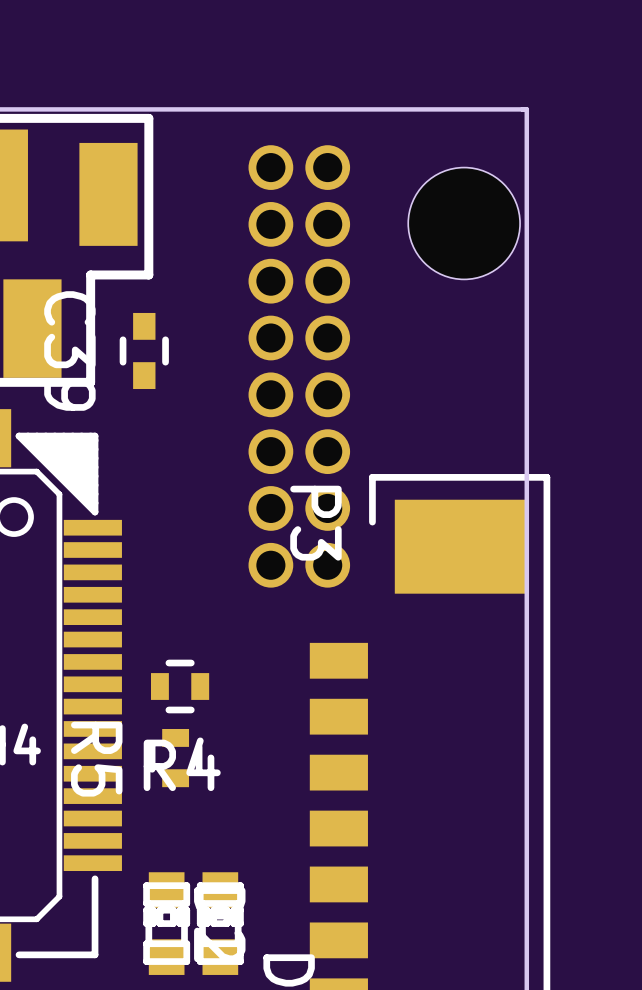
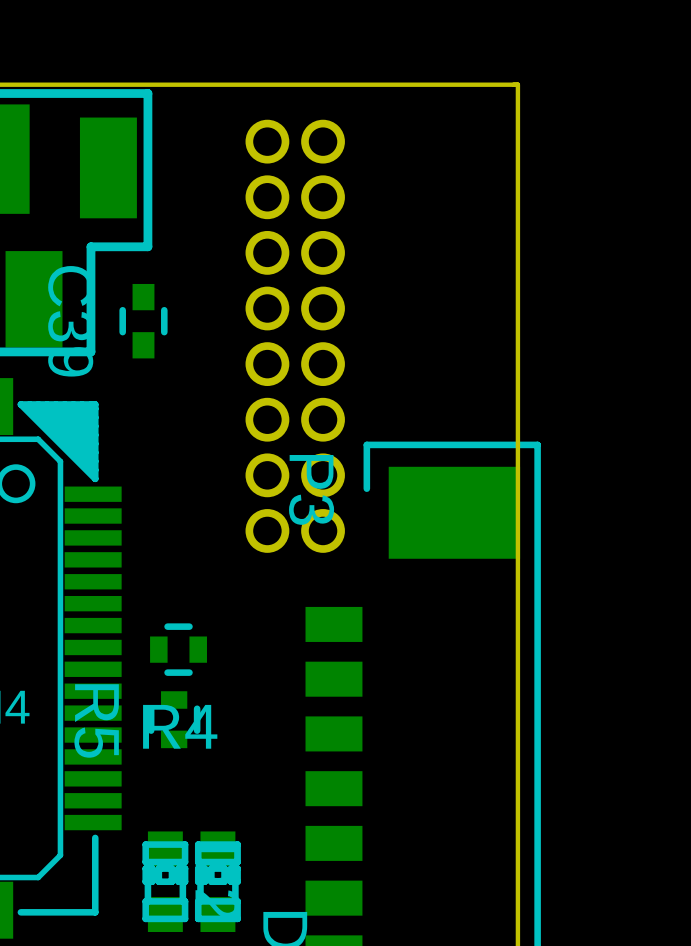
part: (464, 223) -> none

